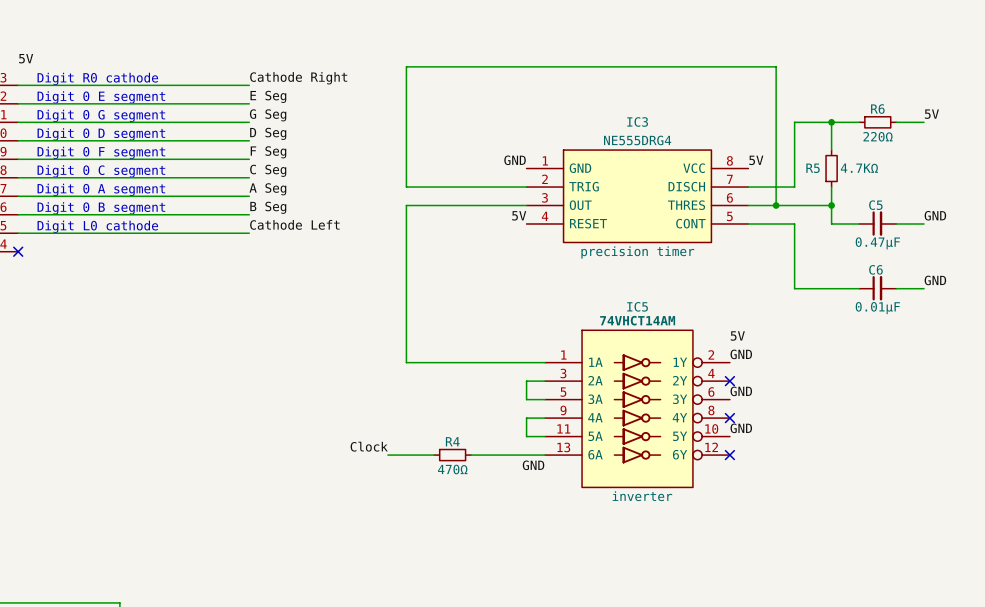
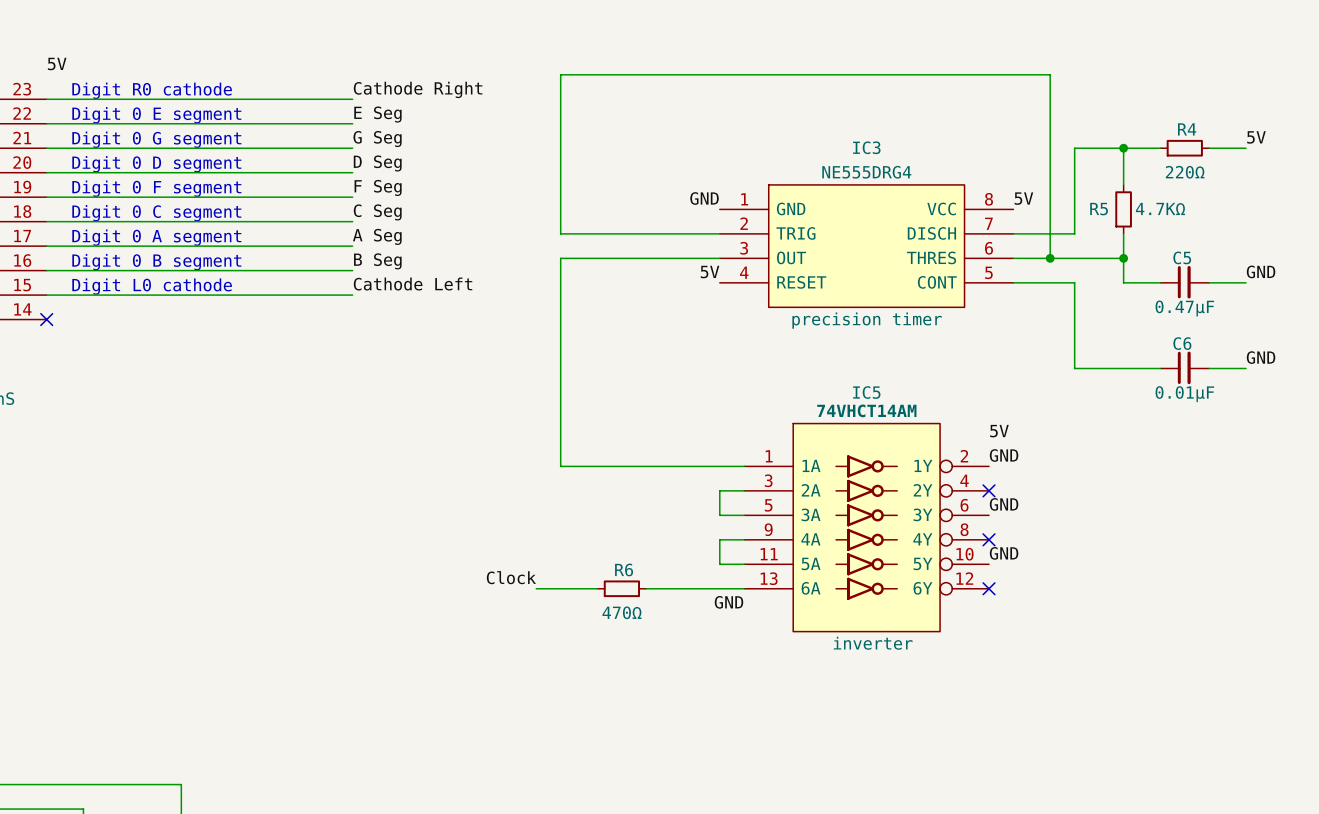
R6 symbol: [859, 116, 897, 129] -> [597, 580, 647, 598]
R6 text: 220Ω (878, 136) -> 470Ω (622, 612)
R4 symbol: [434, 448, 472, 462] -> [1160, 139, 1210, 157]
R4 text: 470Ω (452, 469) -> 220Ω (1185, 172)

